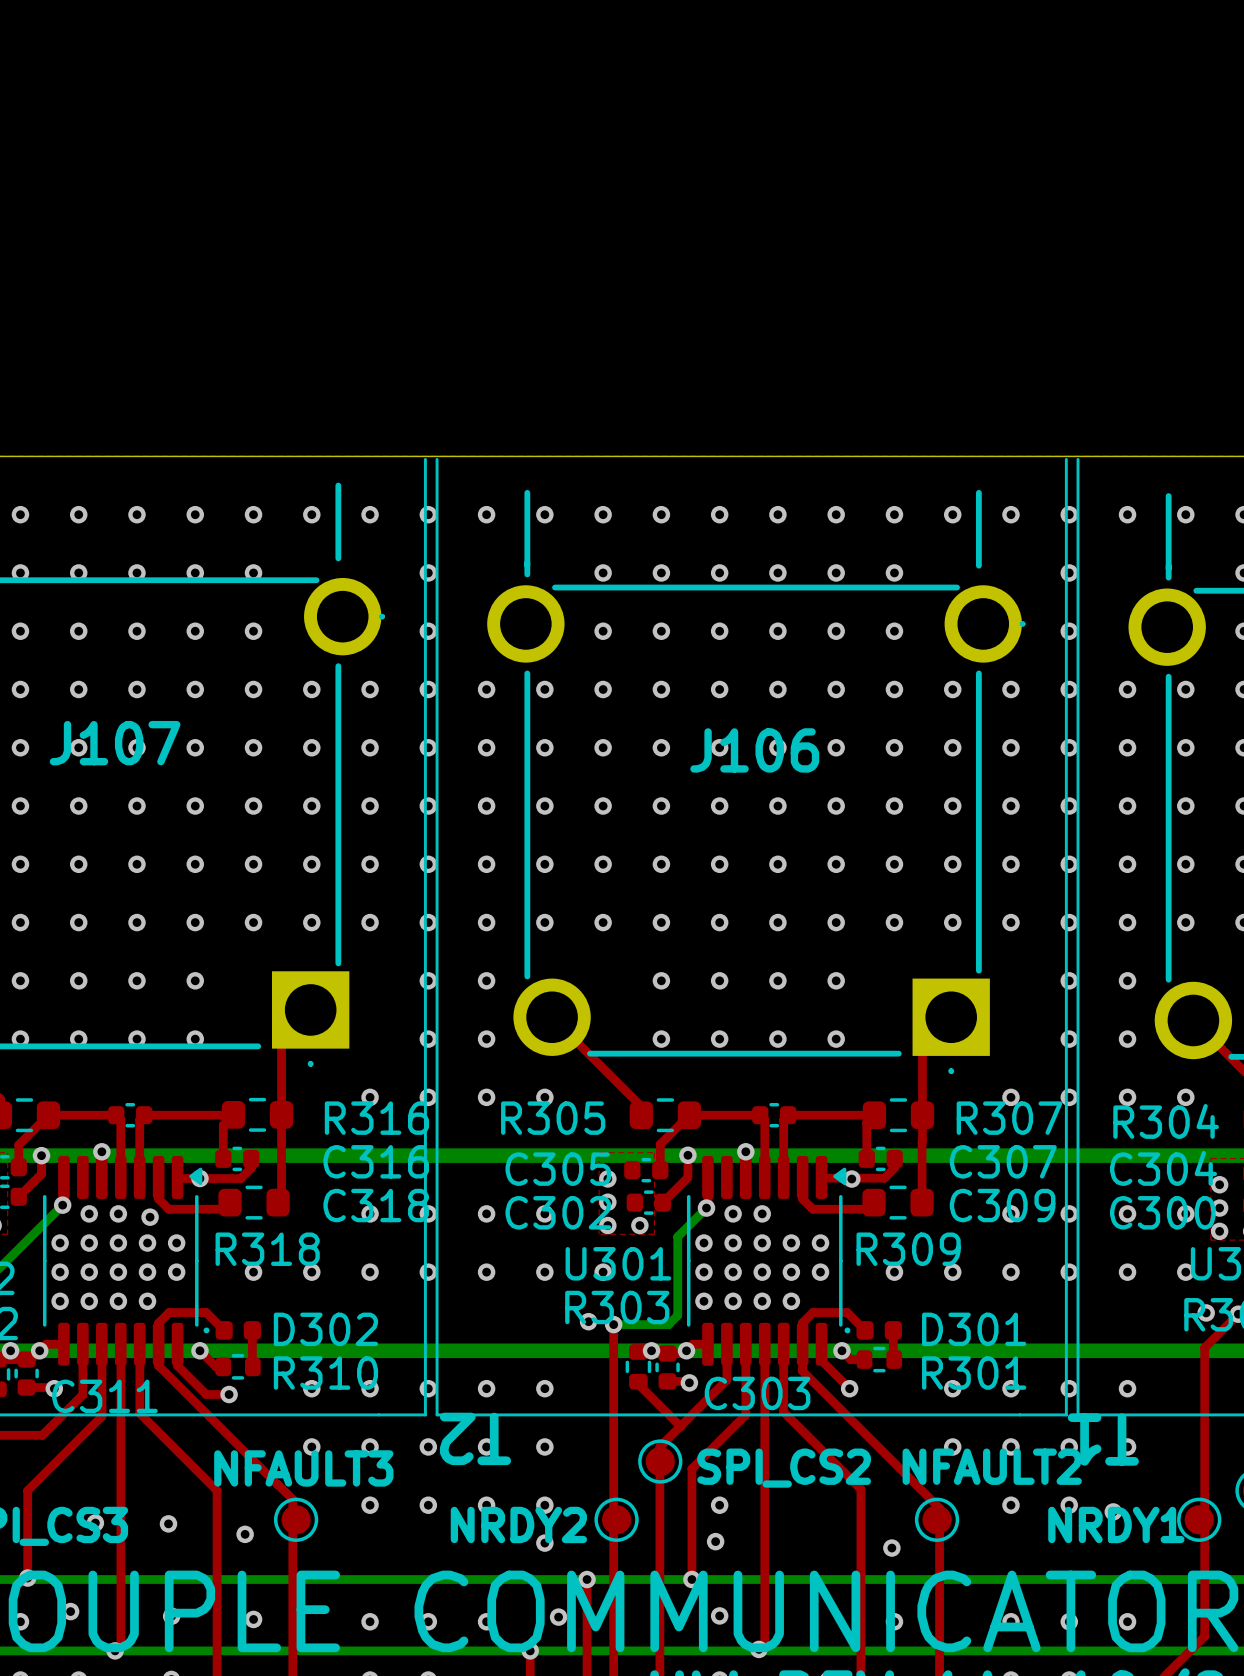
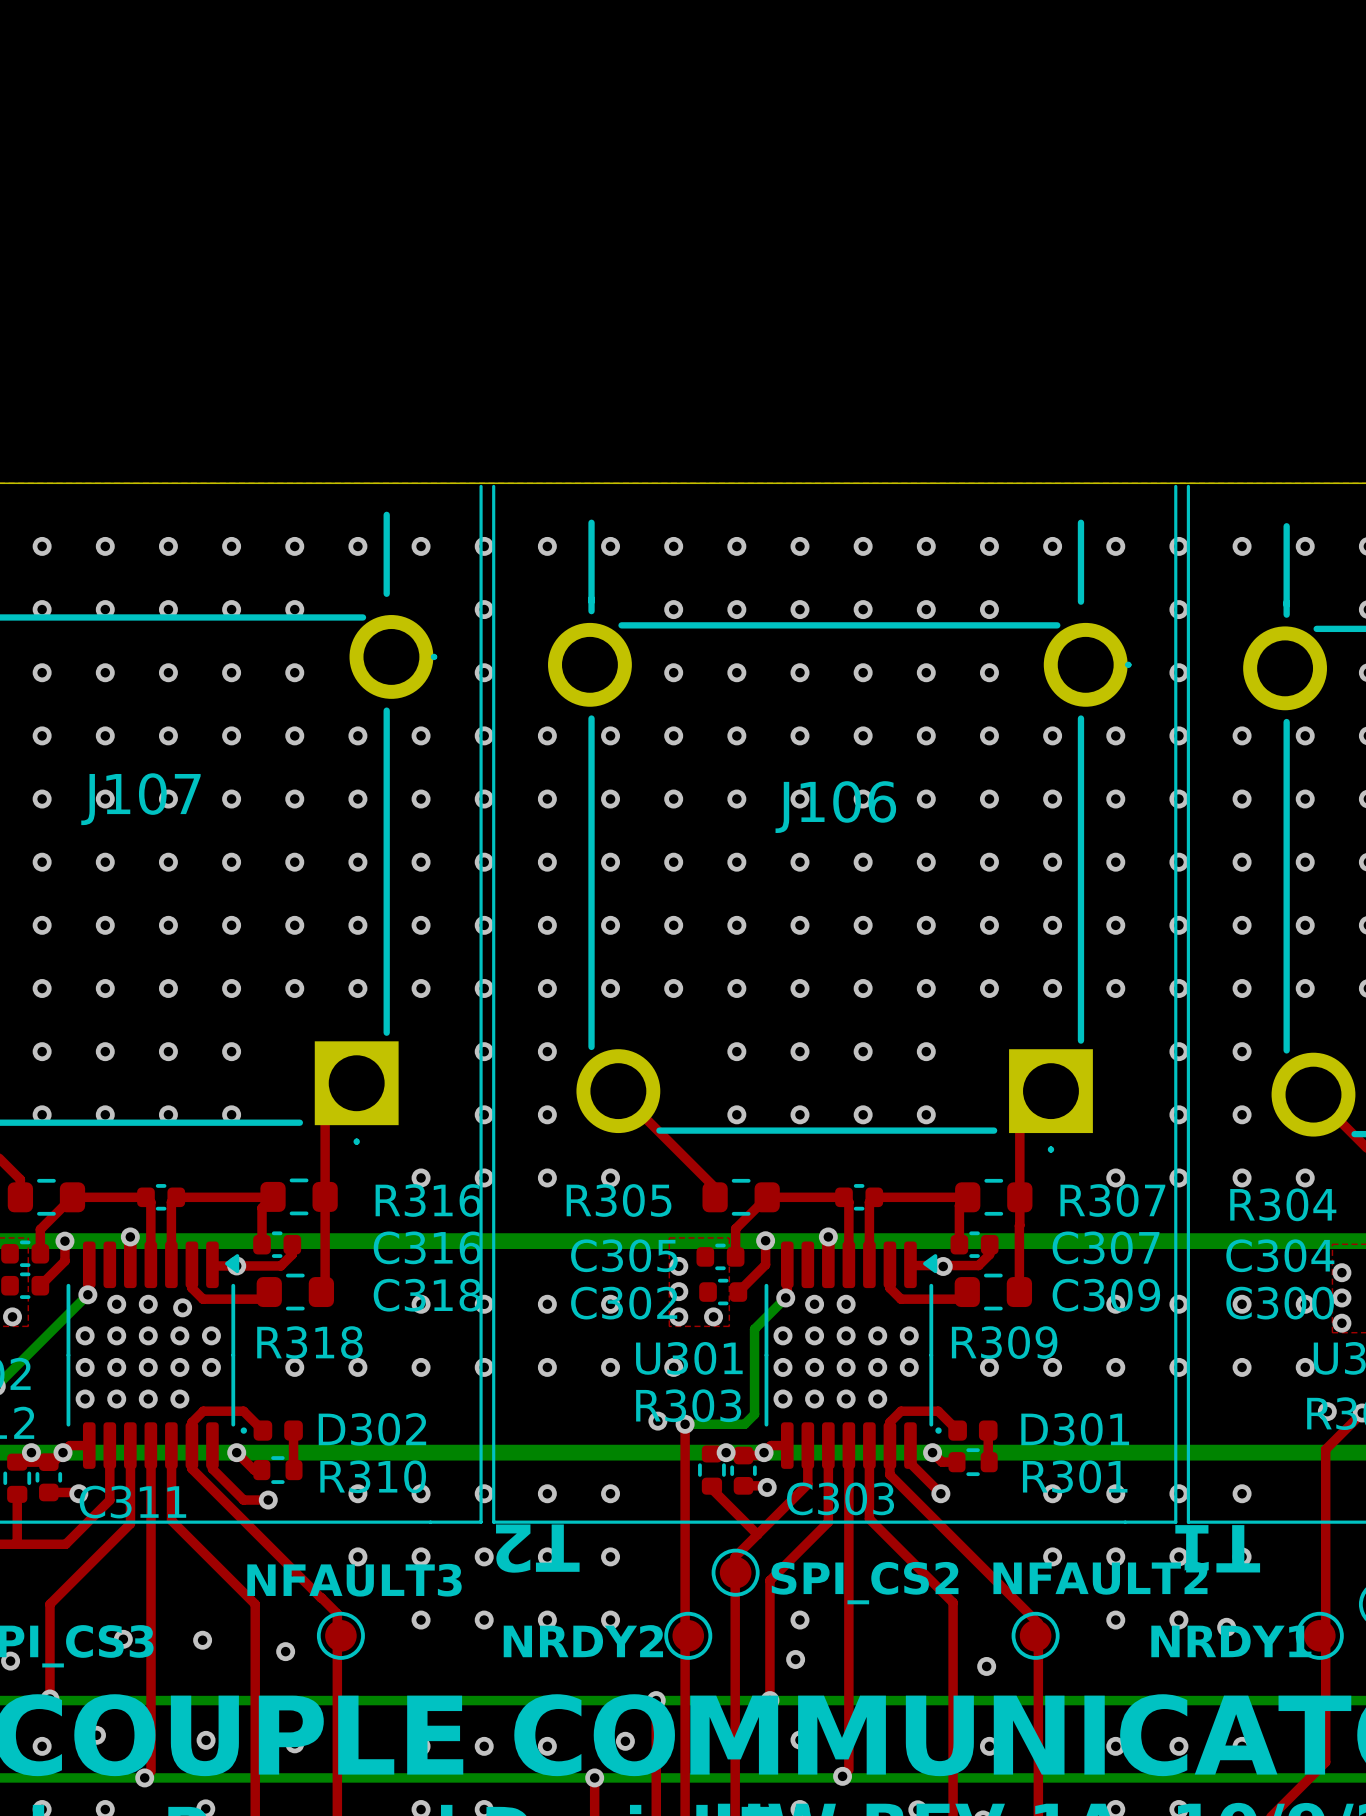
via: (544, 1543) -> none

